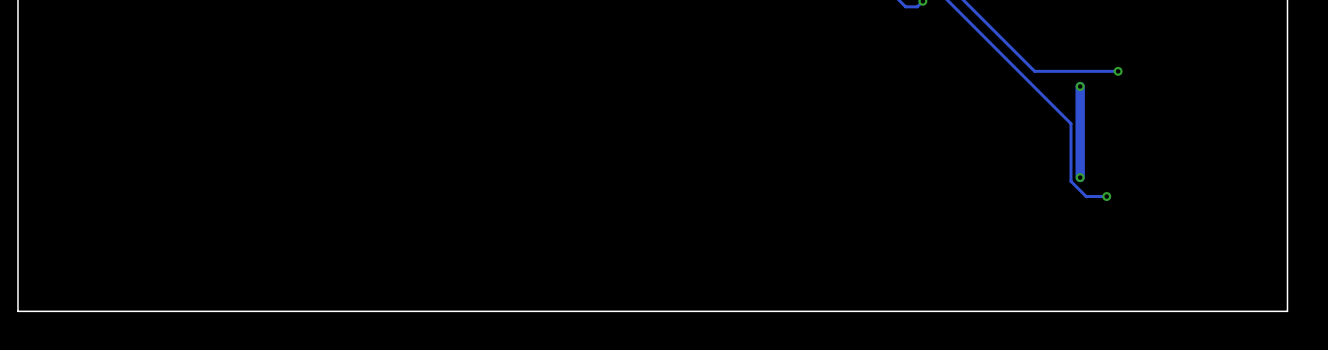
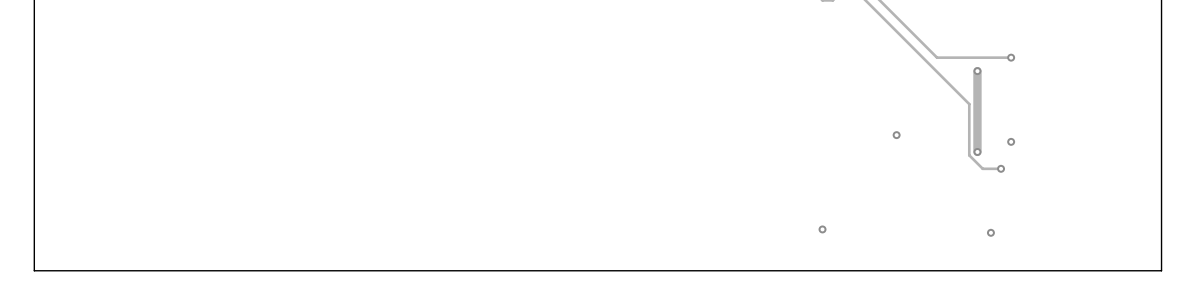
via: none -> (896, 135)
via: none -> (1011, 141)
via: none -> (822, 229)
via: none -> (990, 232)

